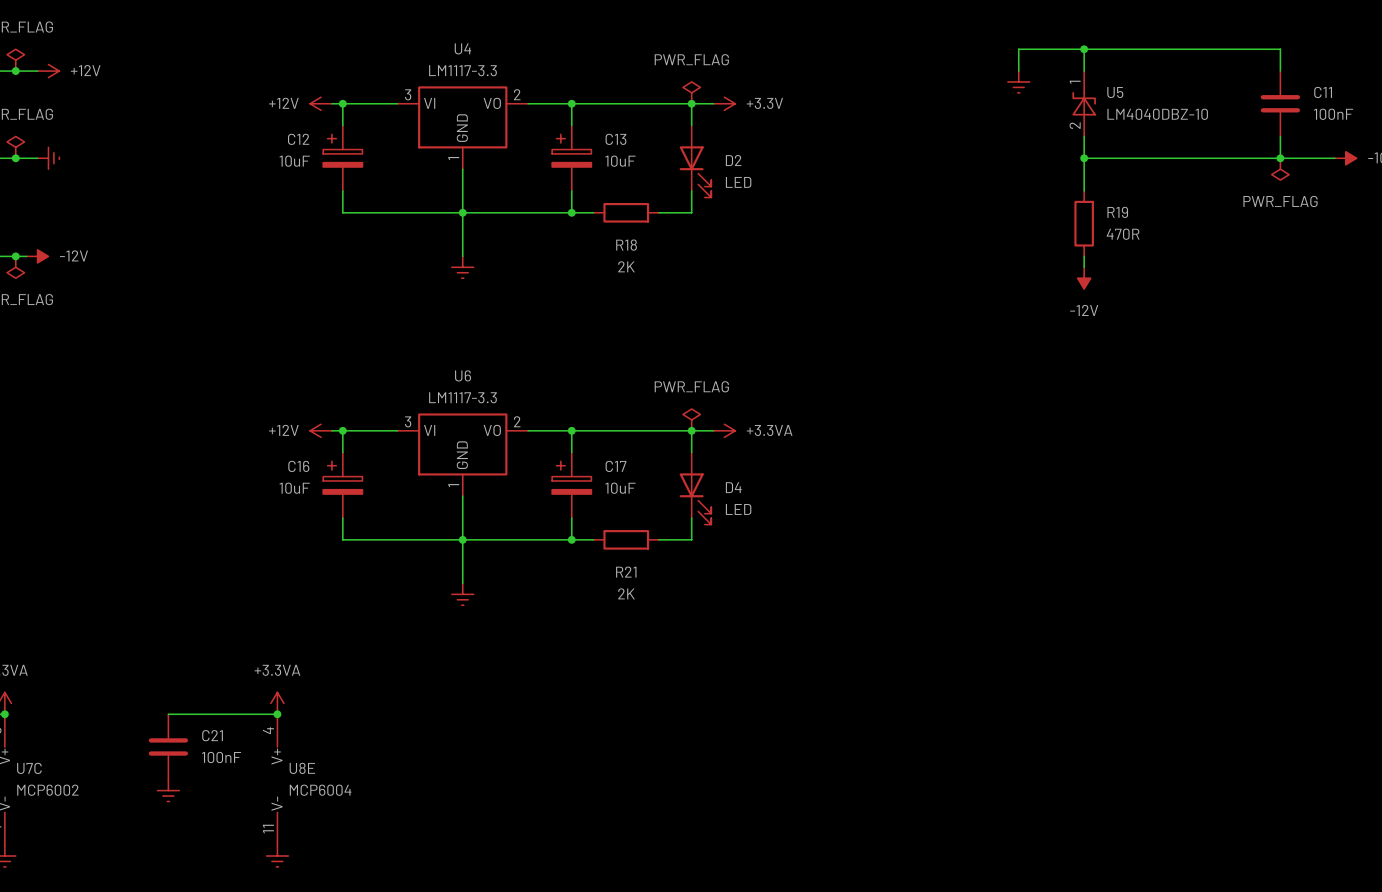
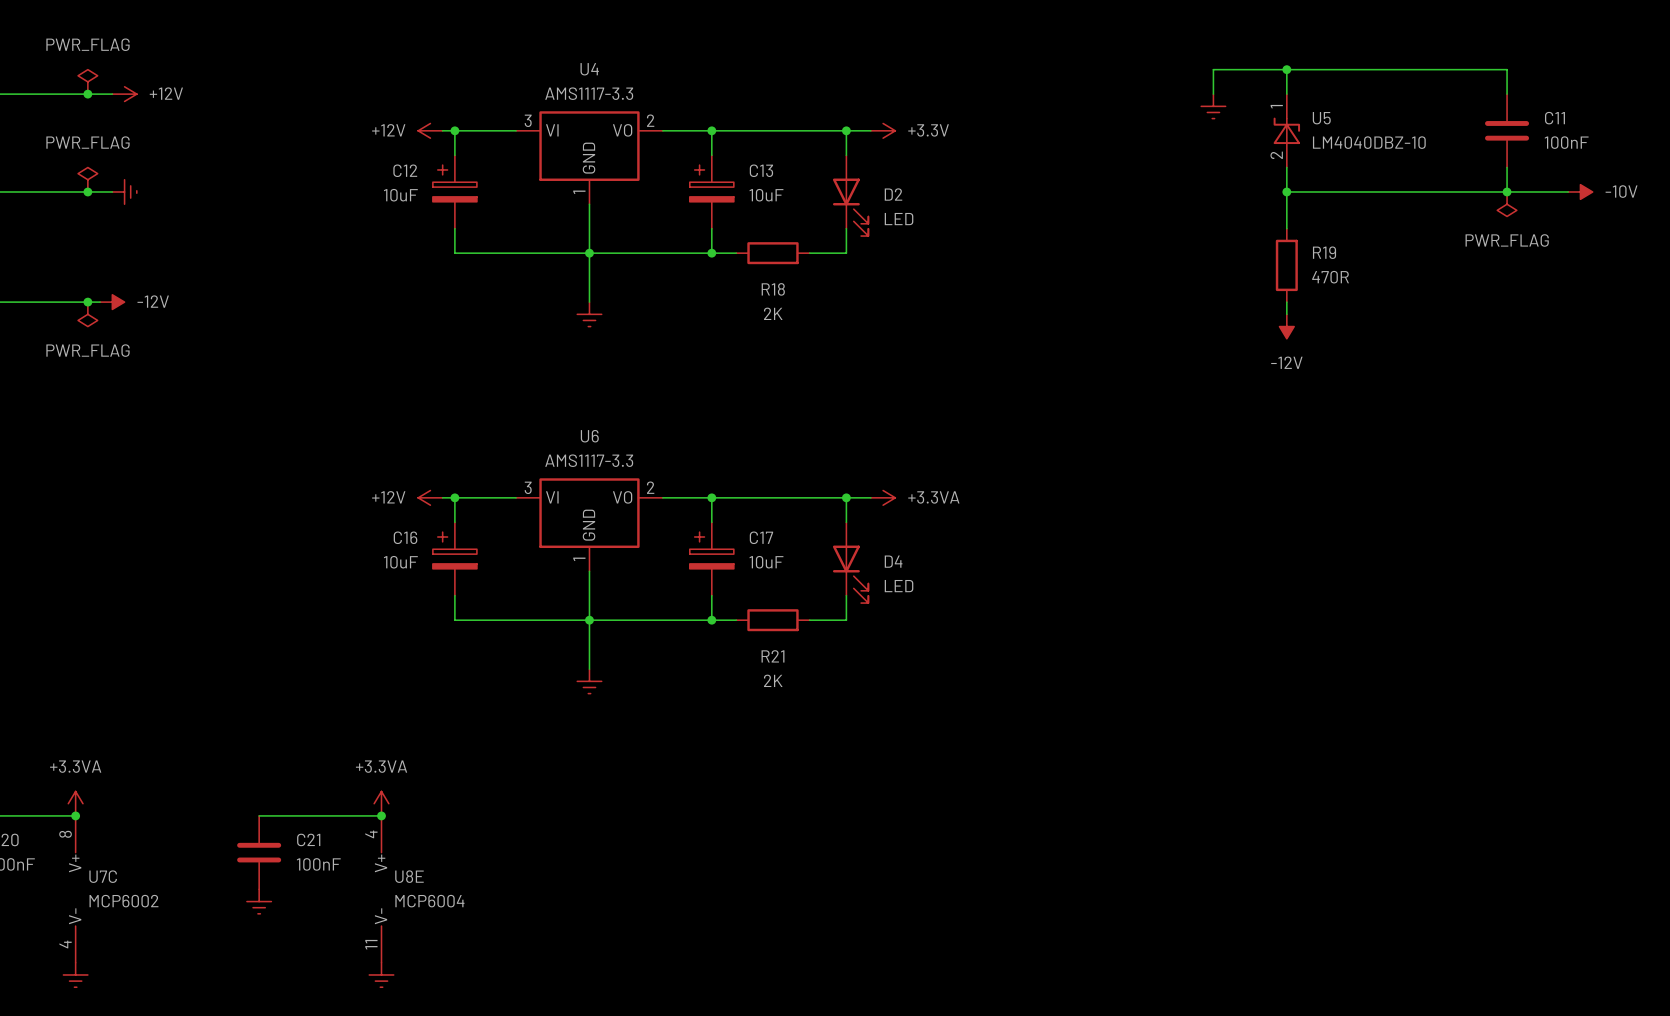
U4 value: LM1117-3.3 (462, 70) -> AMS1117-3.3 (589, 93)
power symbol: PWR_FLAG (691, 92) -> none
U6 value: LM1117-3.3 (462, 397) -> AMS1117-3.3 (589, 460)
power symbol: PWR_FLAG (691, 419) -> none

